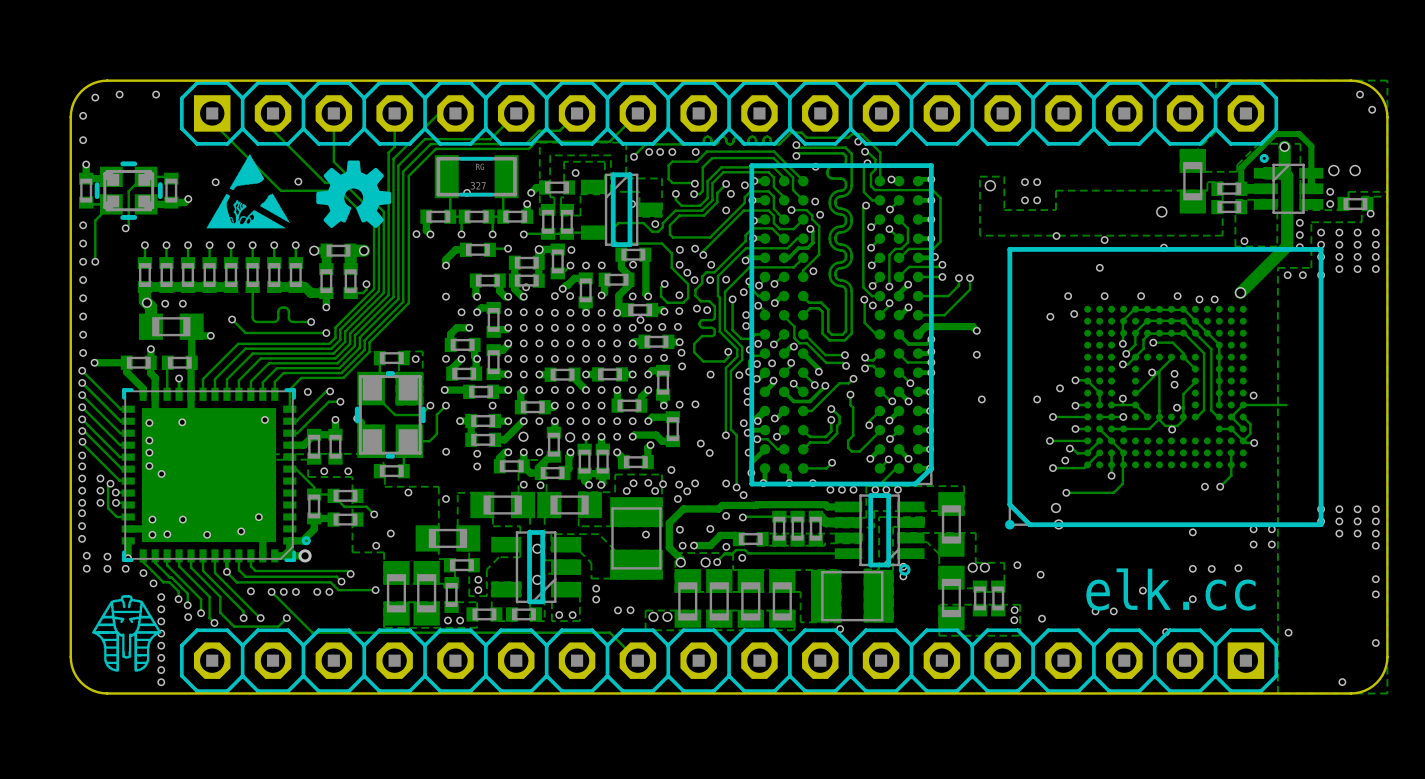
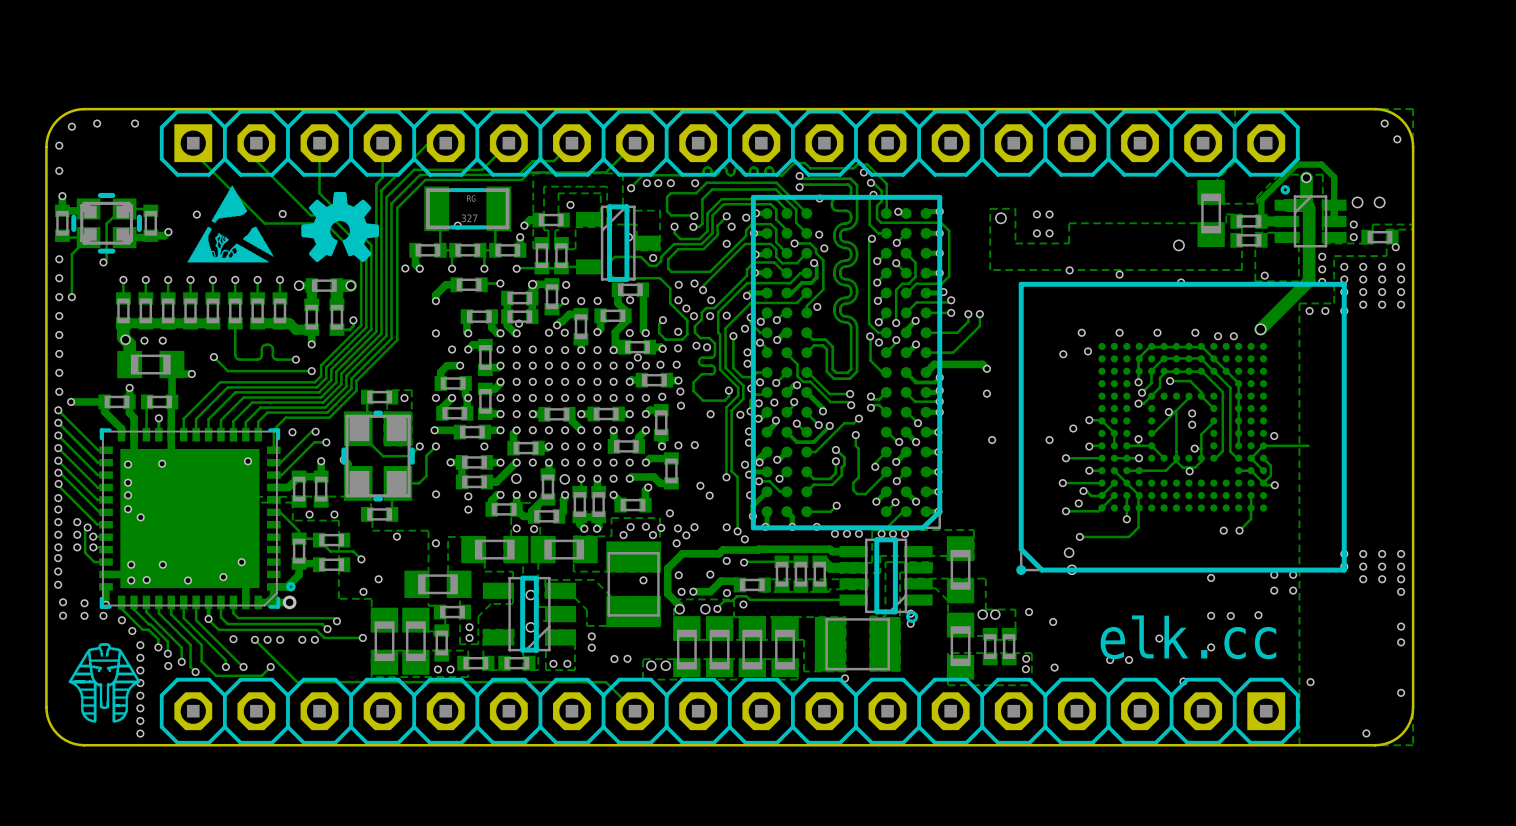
via: (1099, 267) -> none

